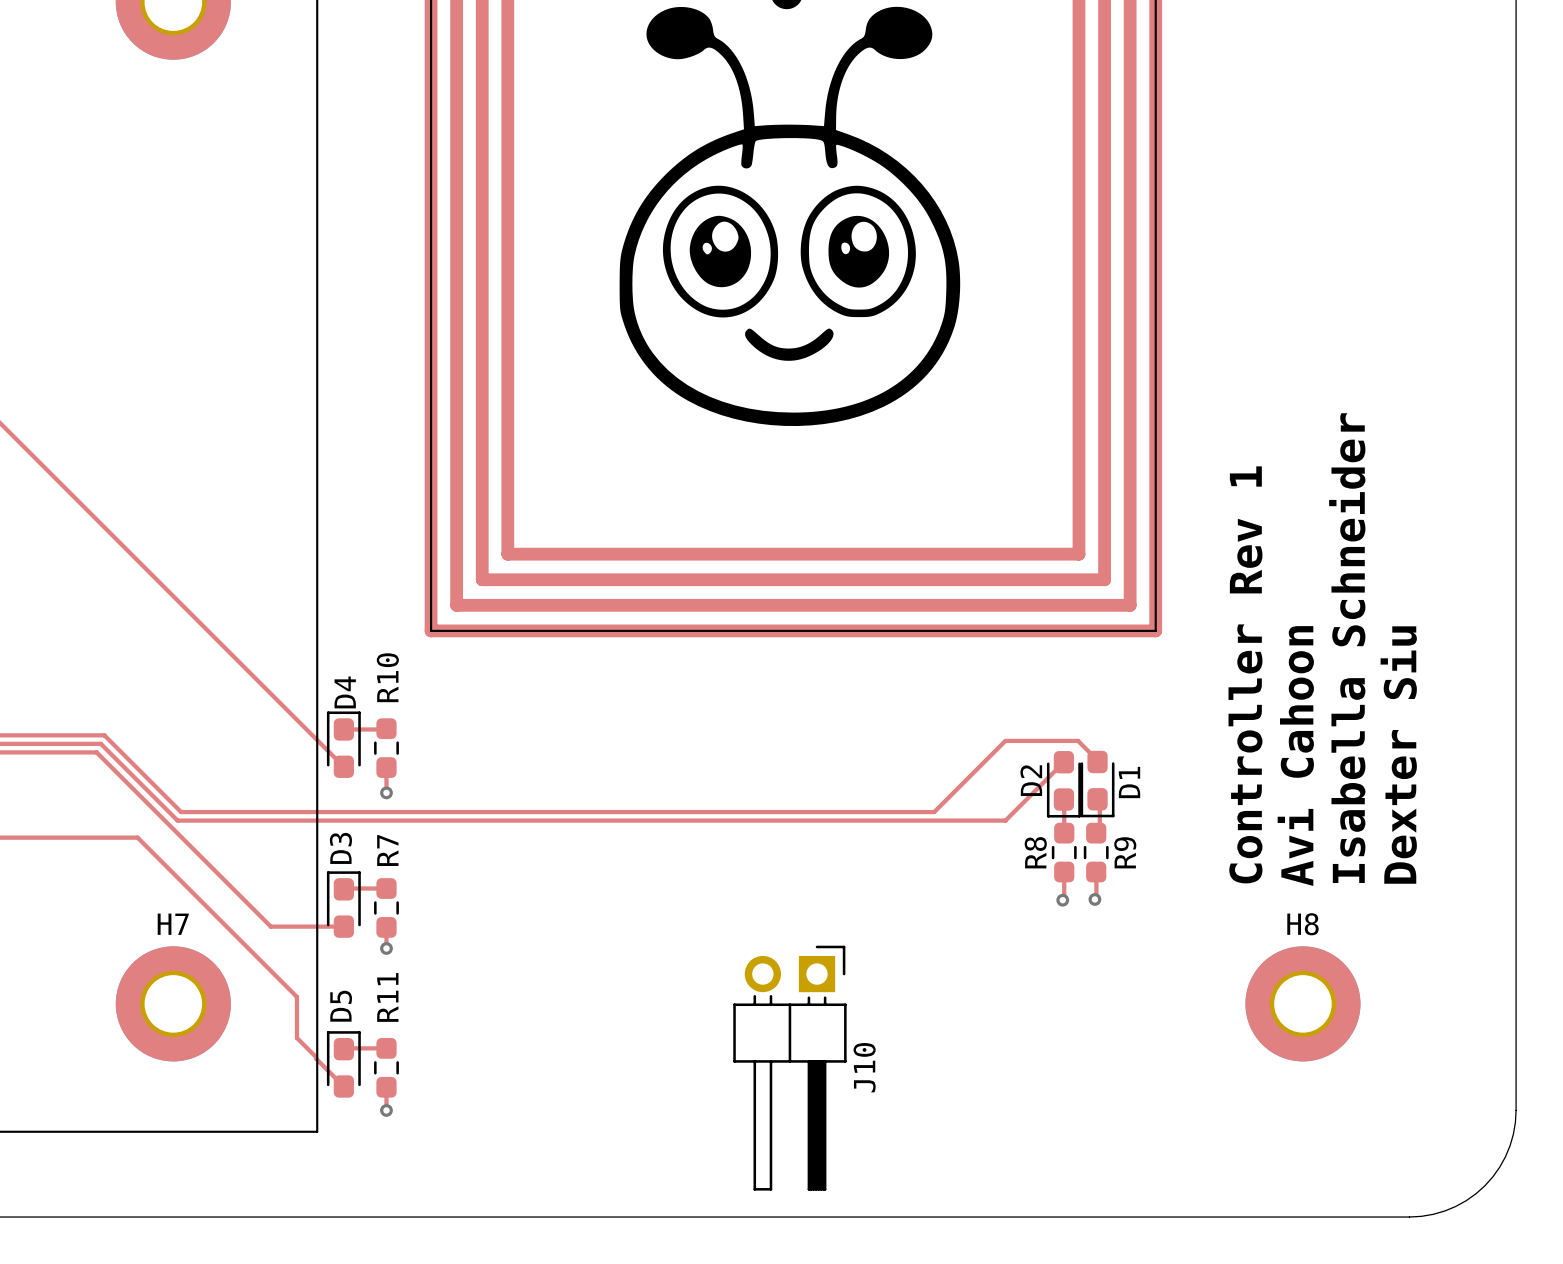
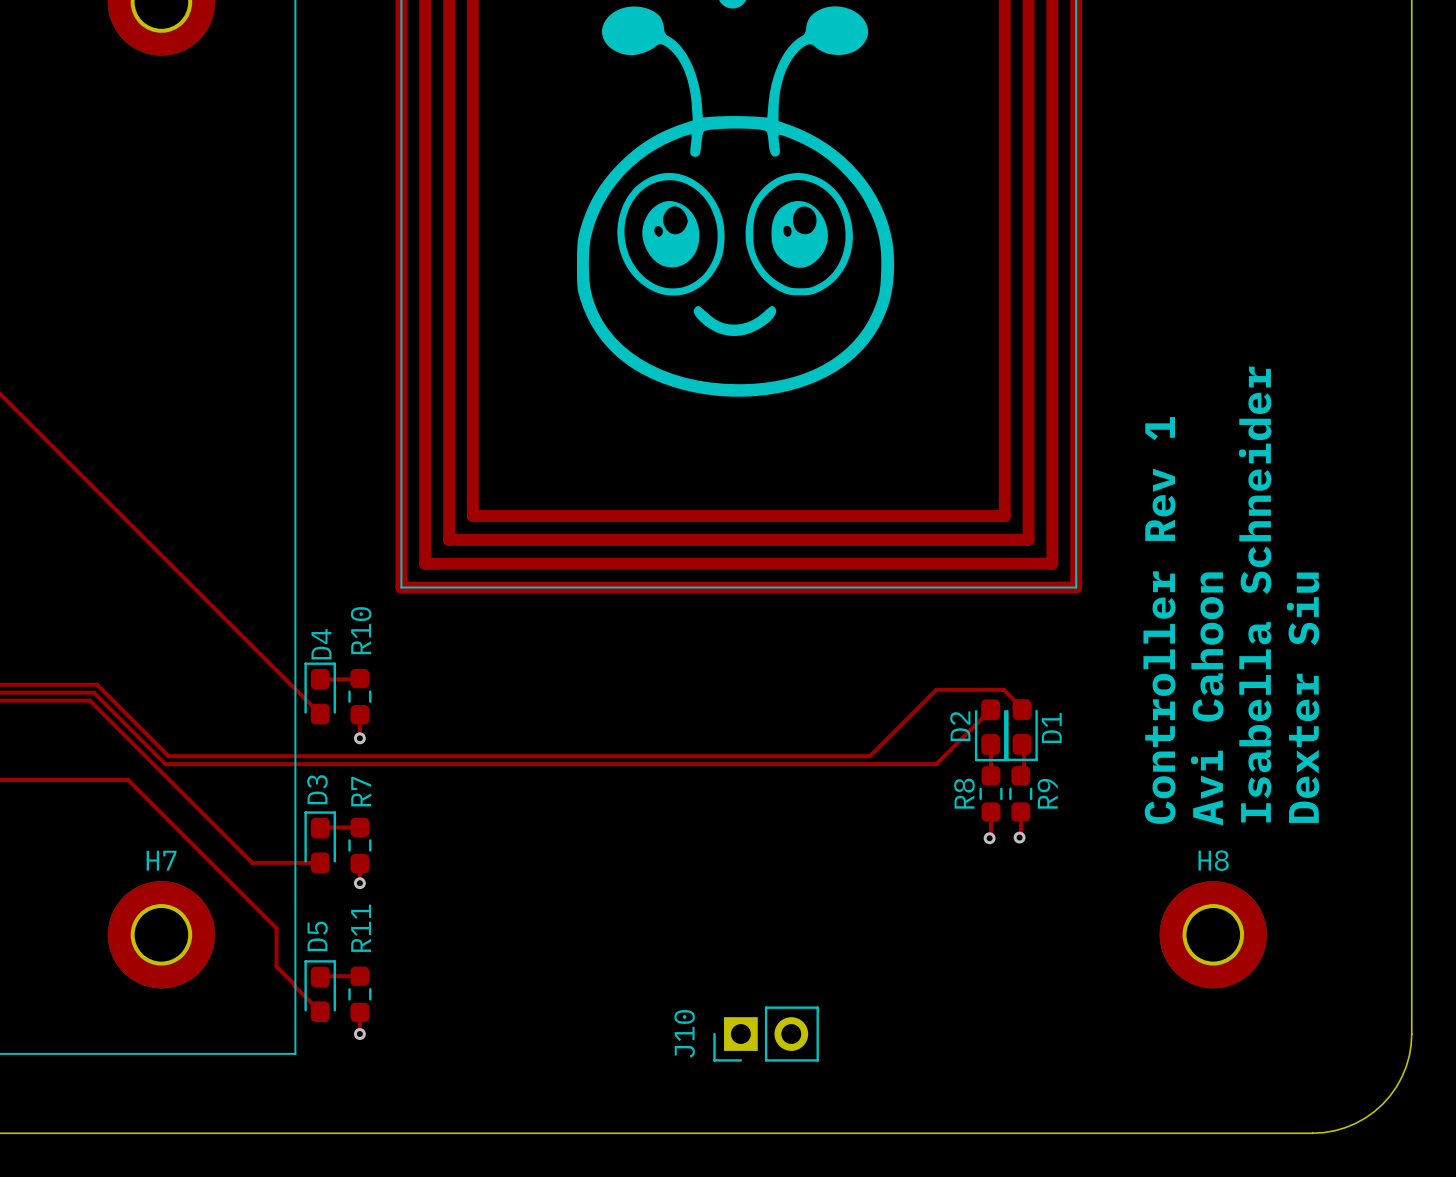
J10 footprint: [733, 945, 847, 1191] -> [713, 1006, 819, 1062]
J10 name position: J10 (864, 1067) -> J10 (684, 1033)

